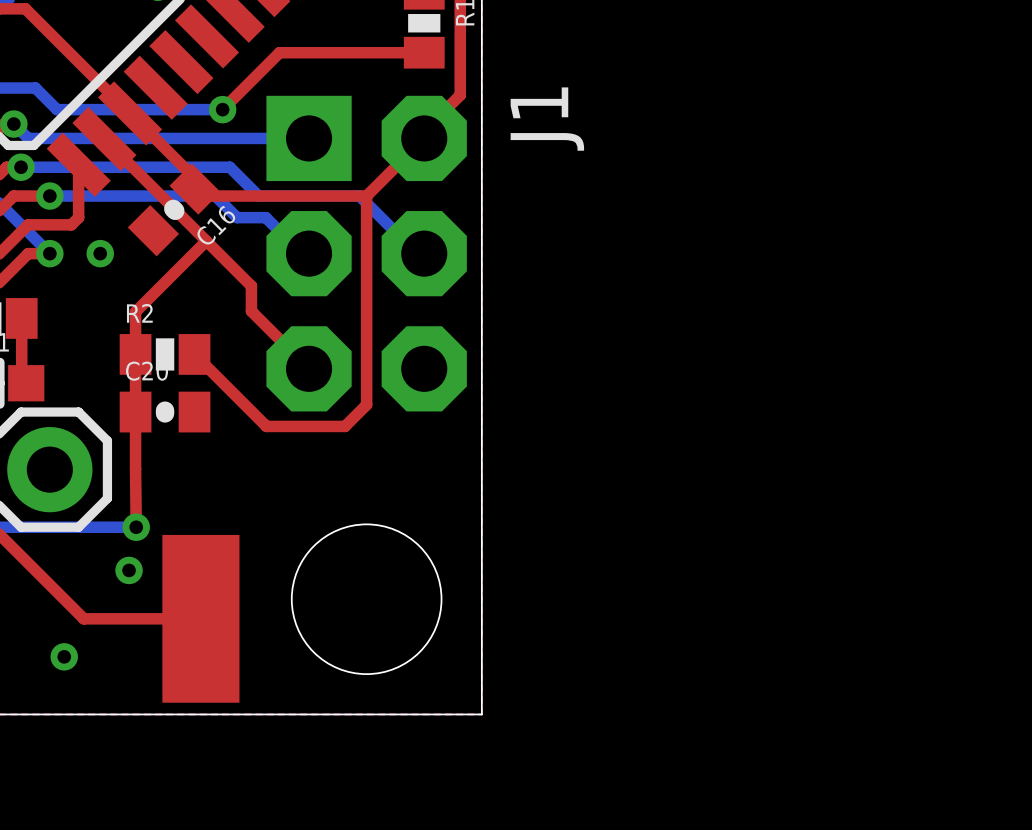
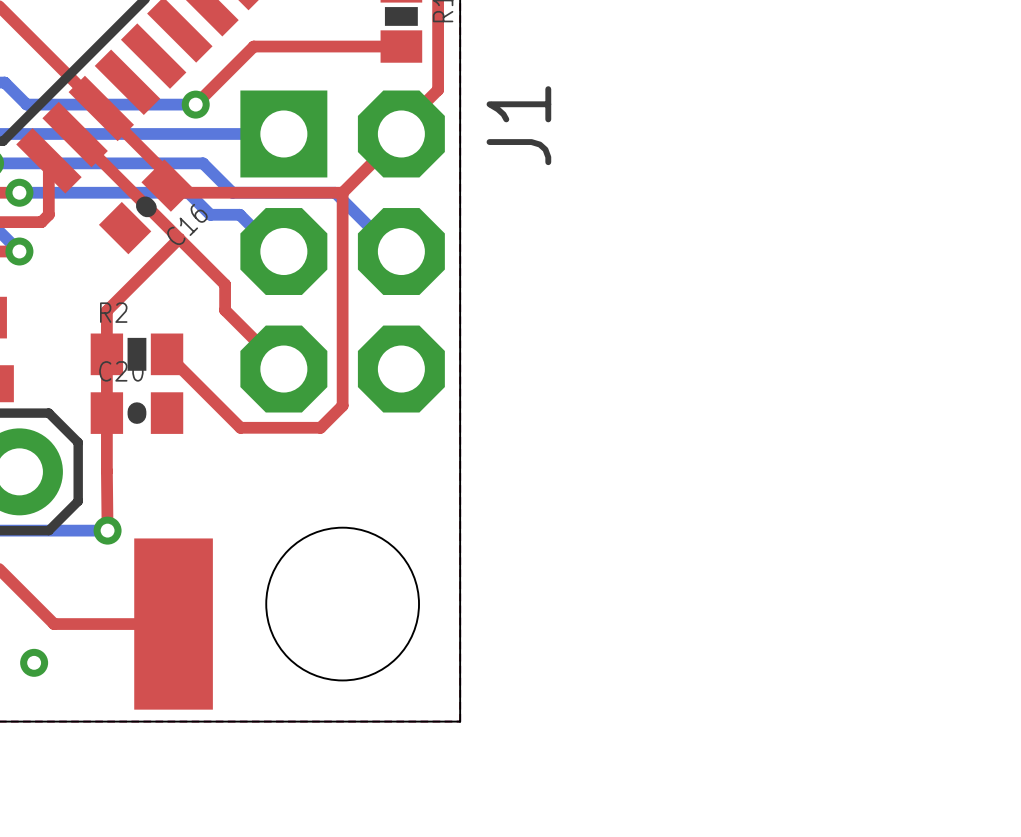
via: (100, 253) -> none
via: (129, 570) -> none

